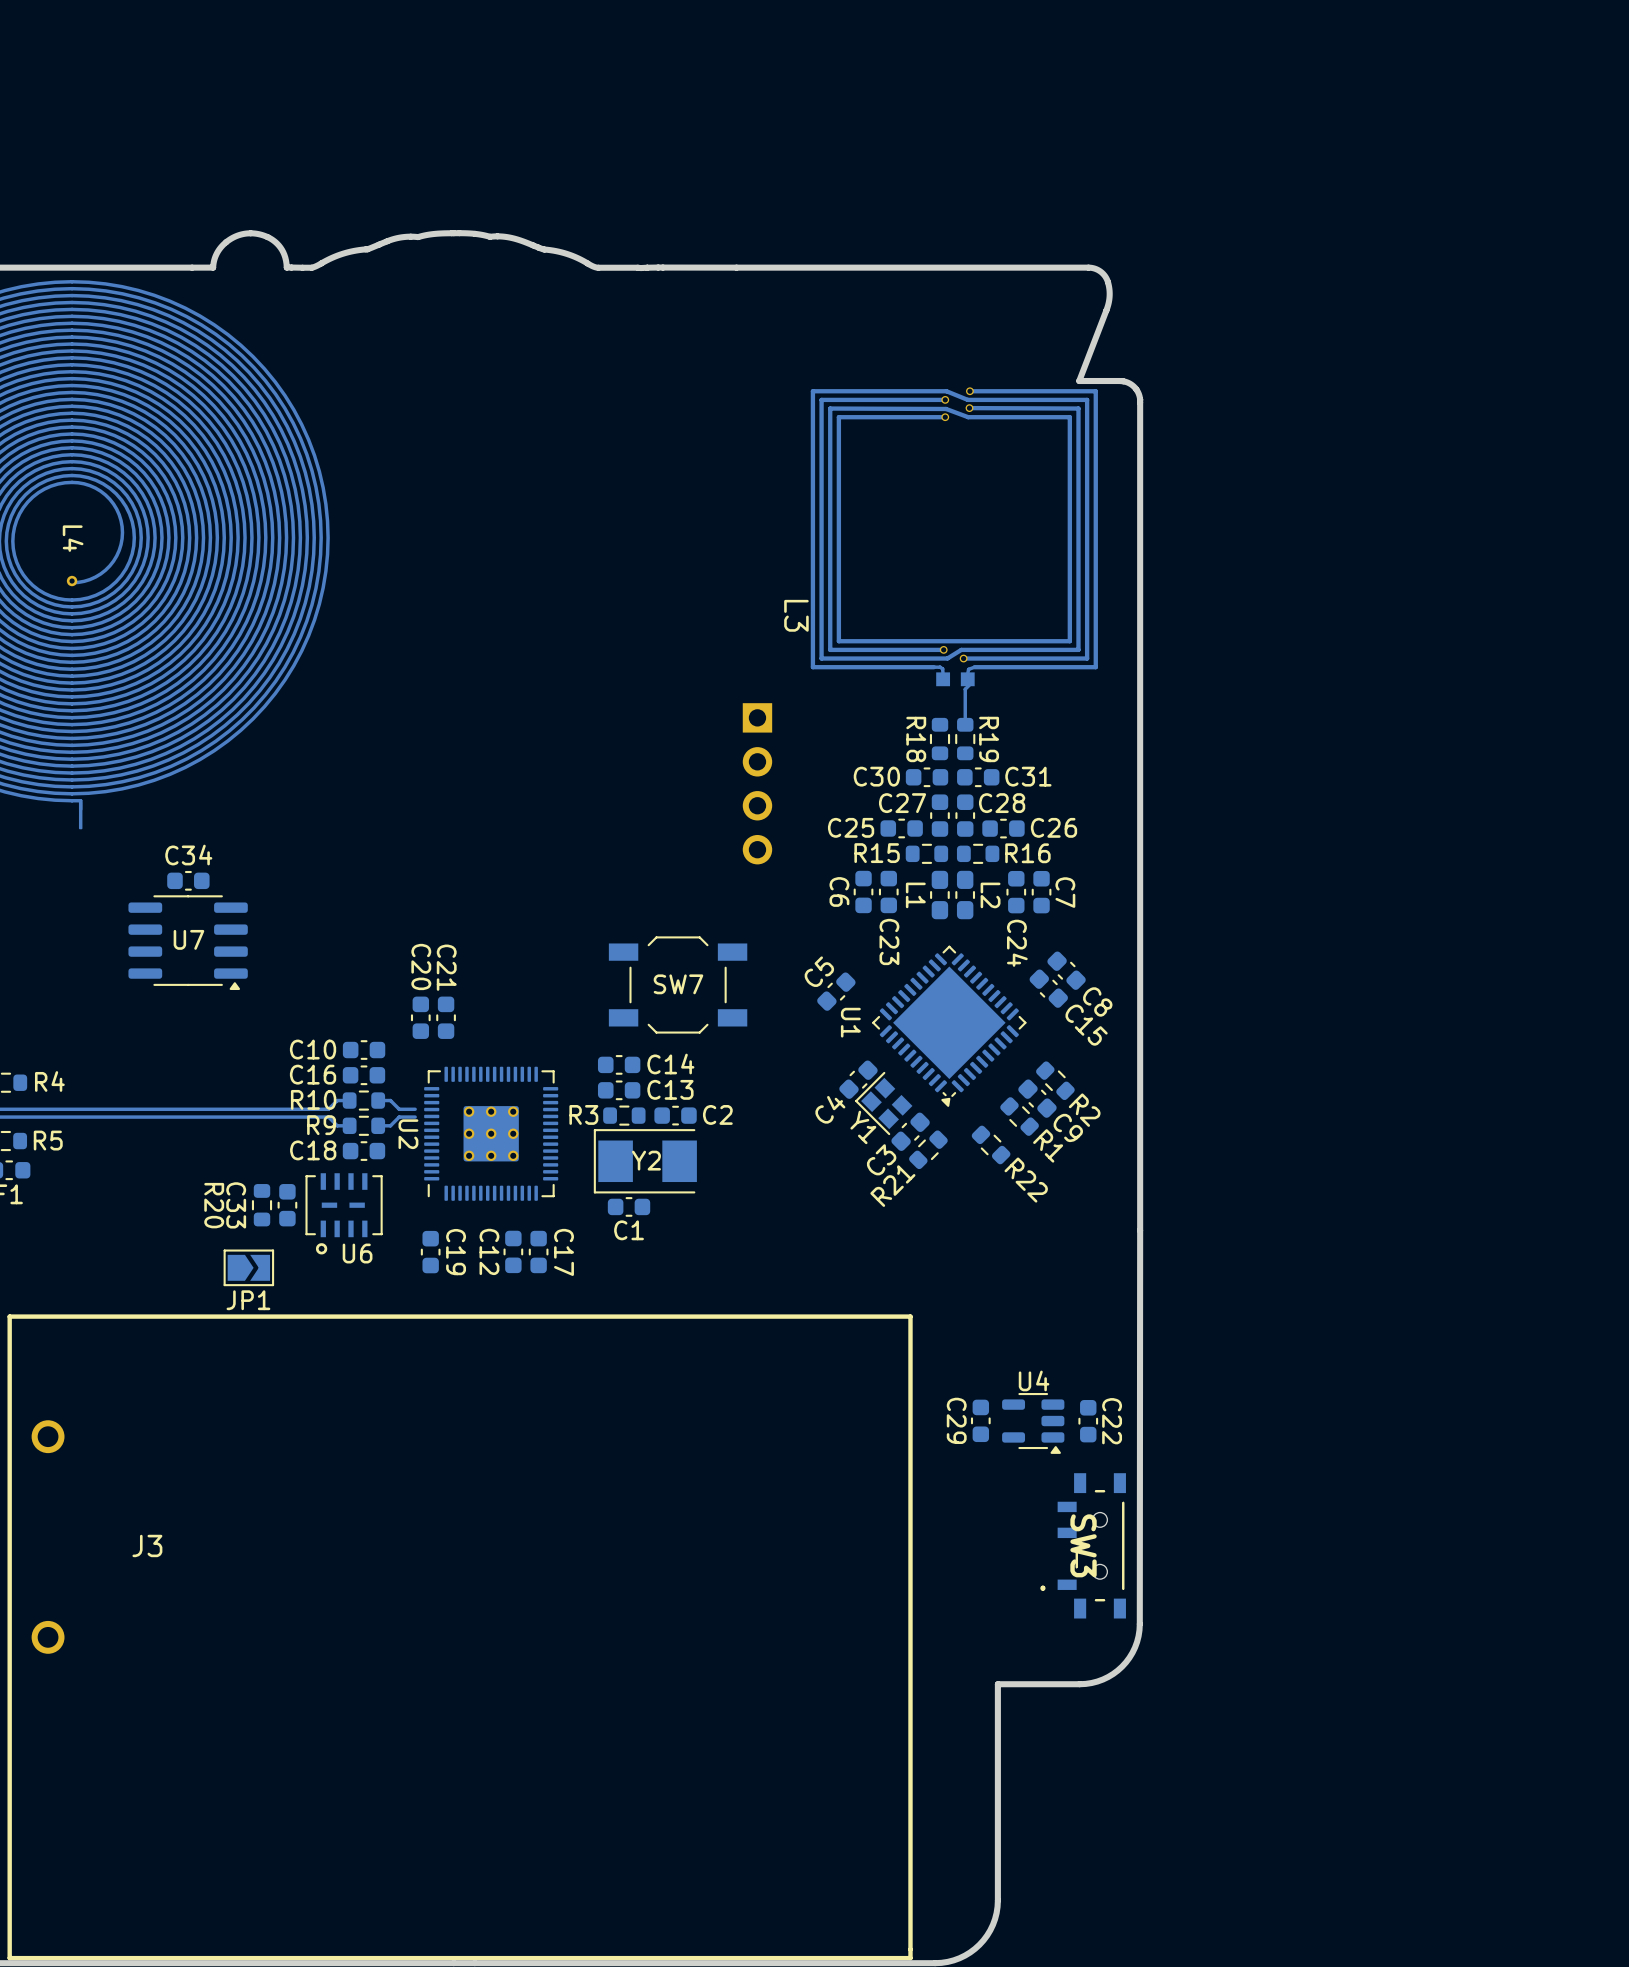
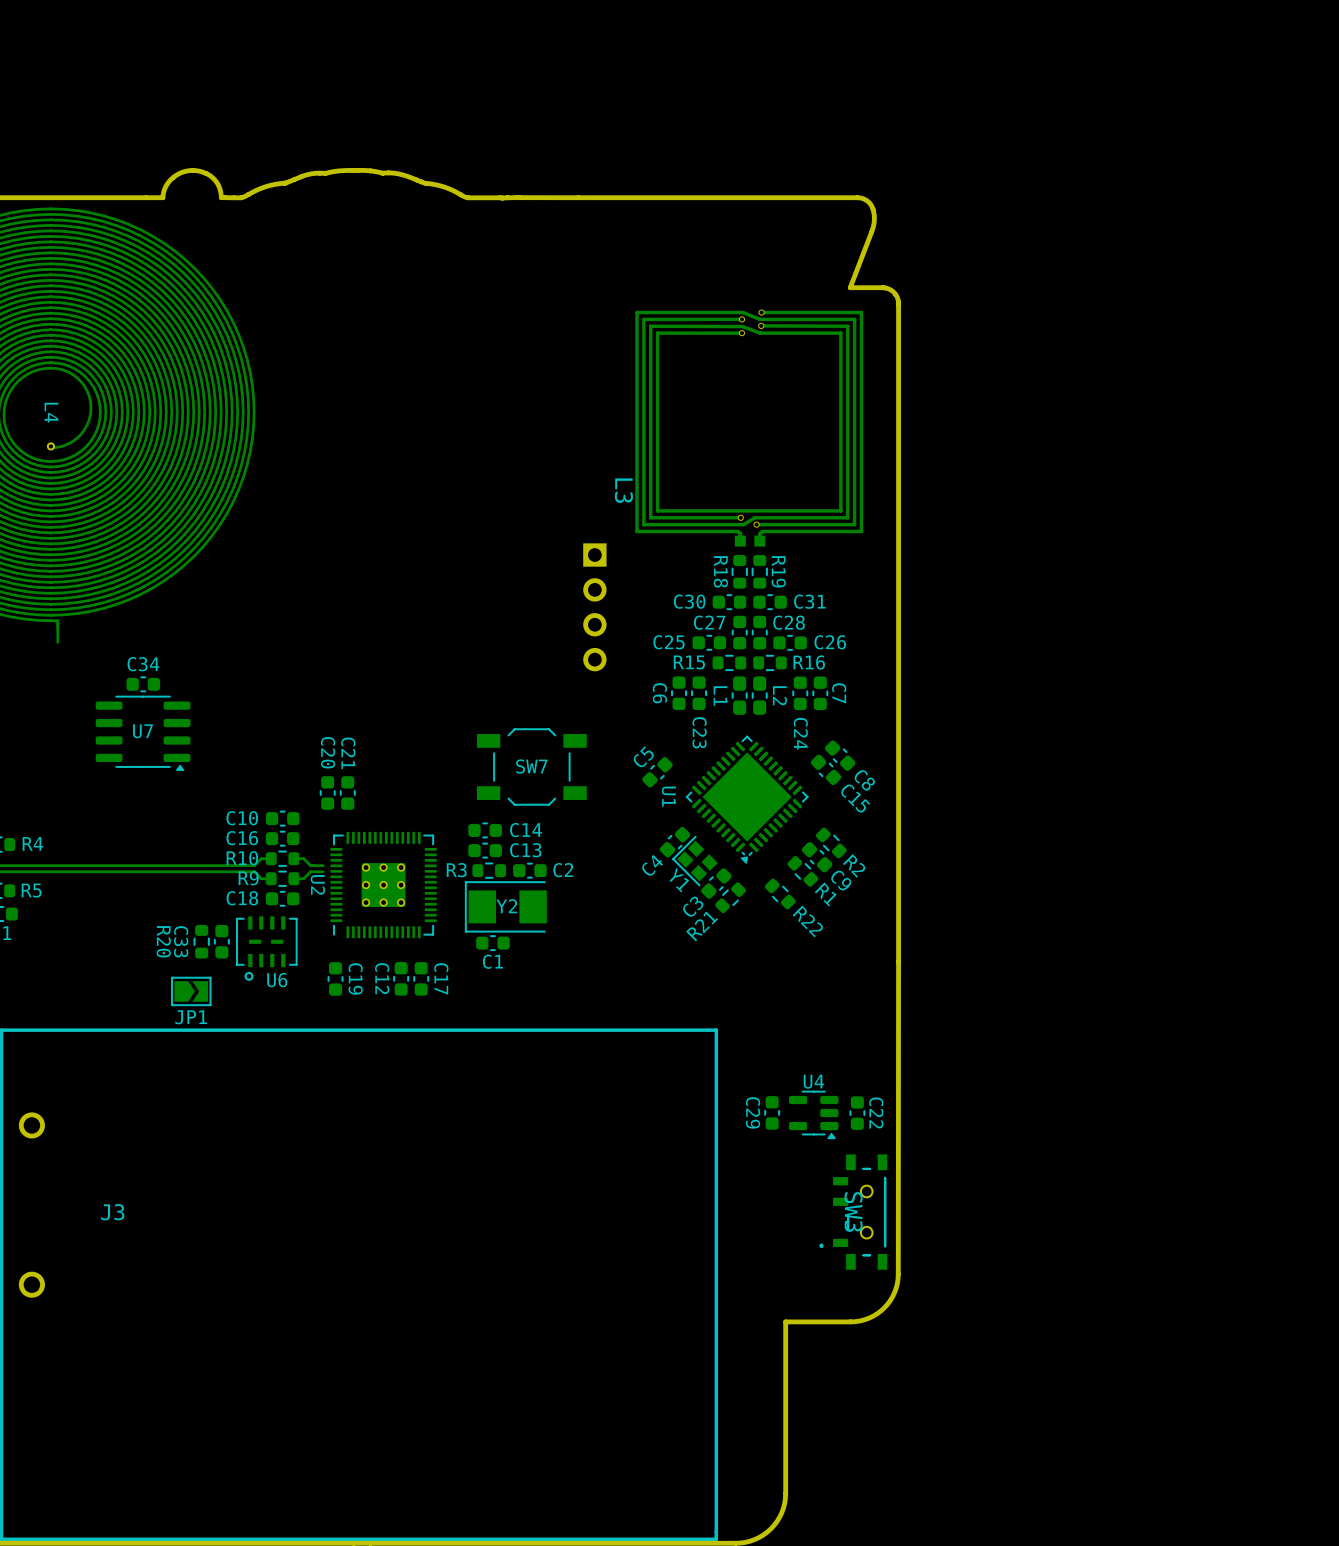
L3 footprint: [810, 387, 1098, 687] -> [635, 309, 864, 547]
track: (970, 683) (965, 689) (965, 724) -> none

